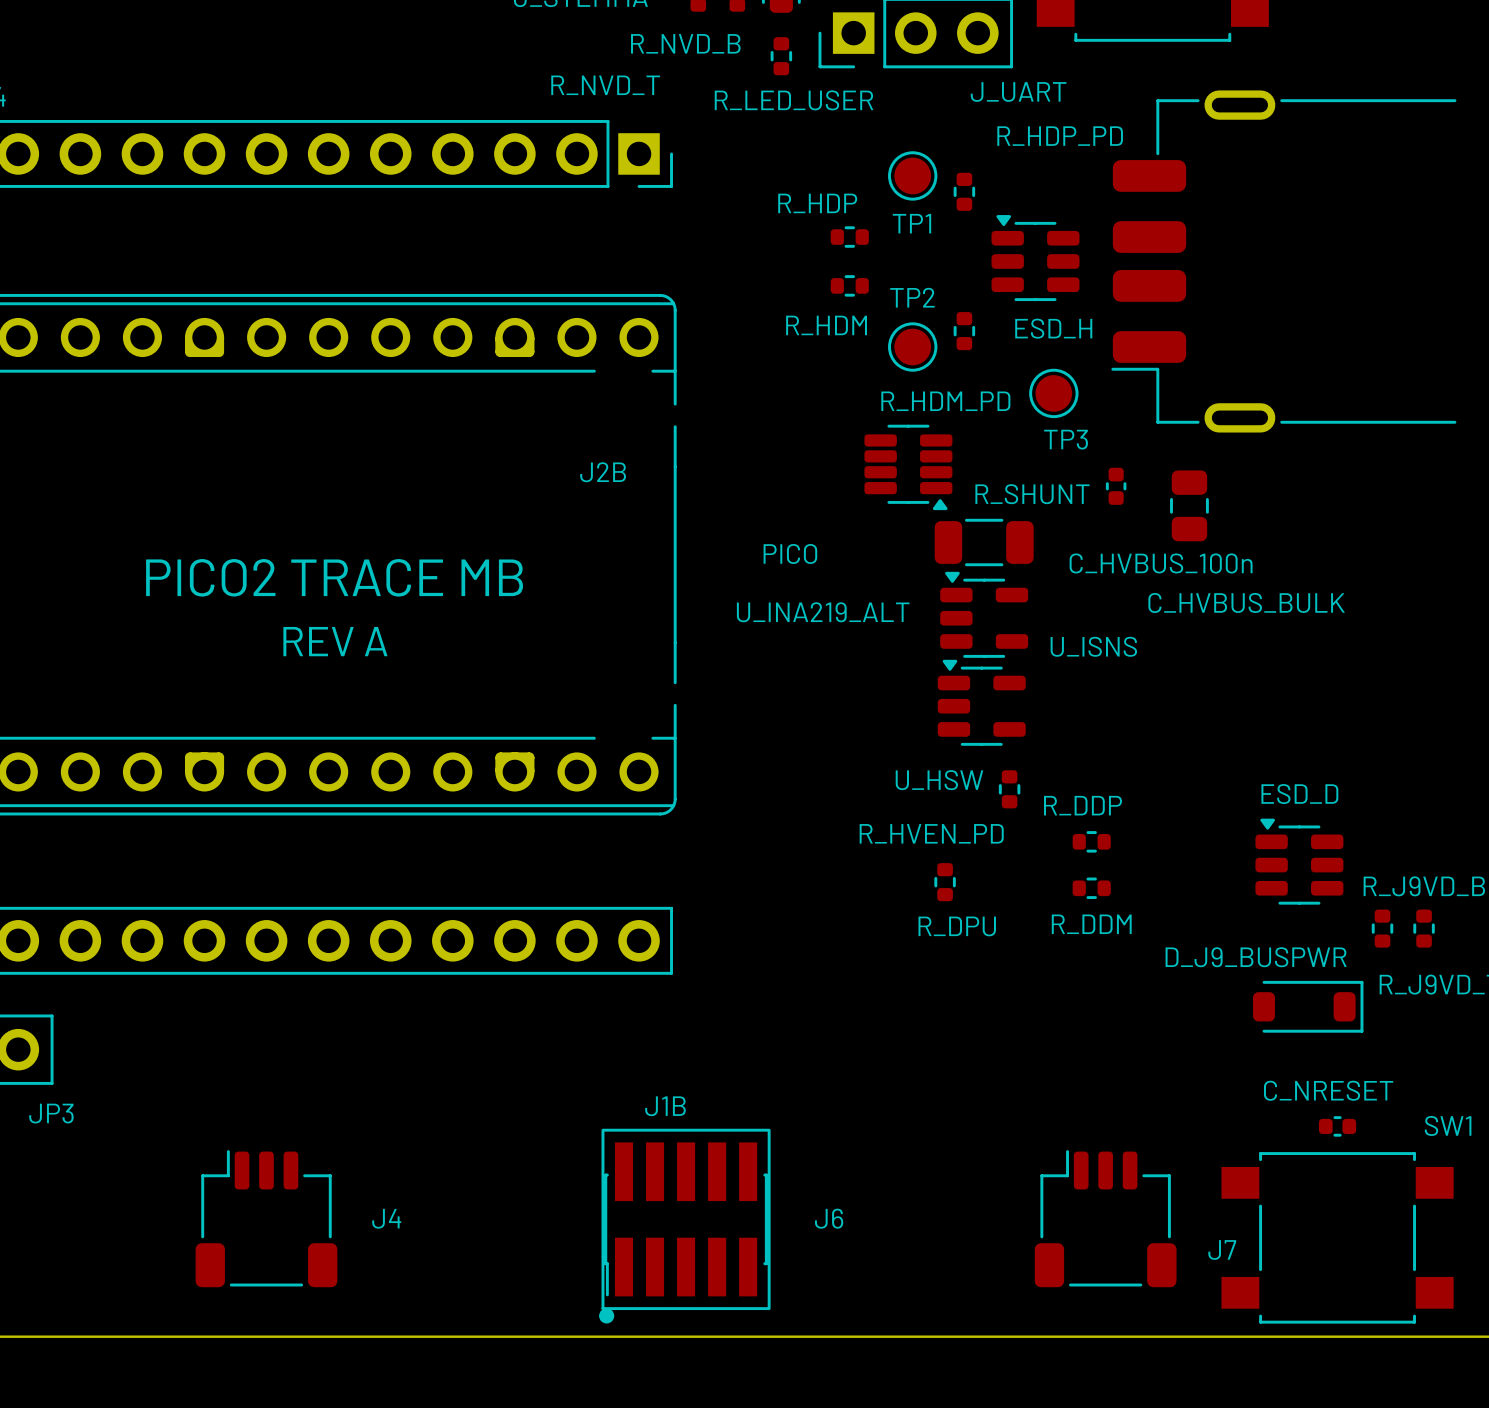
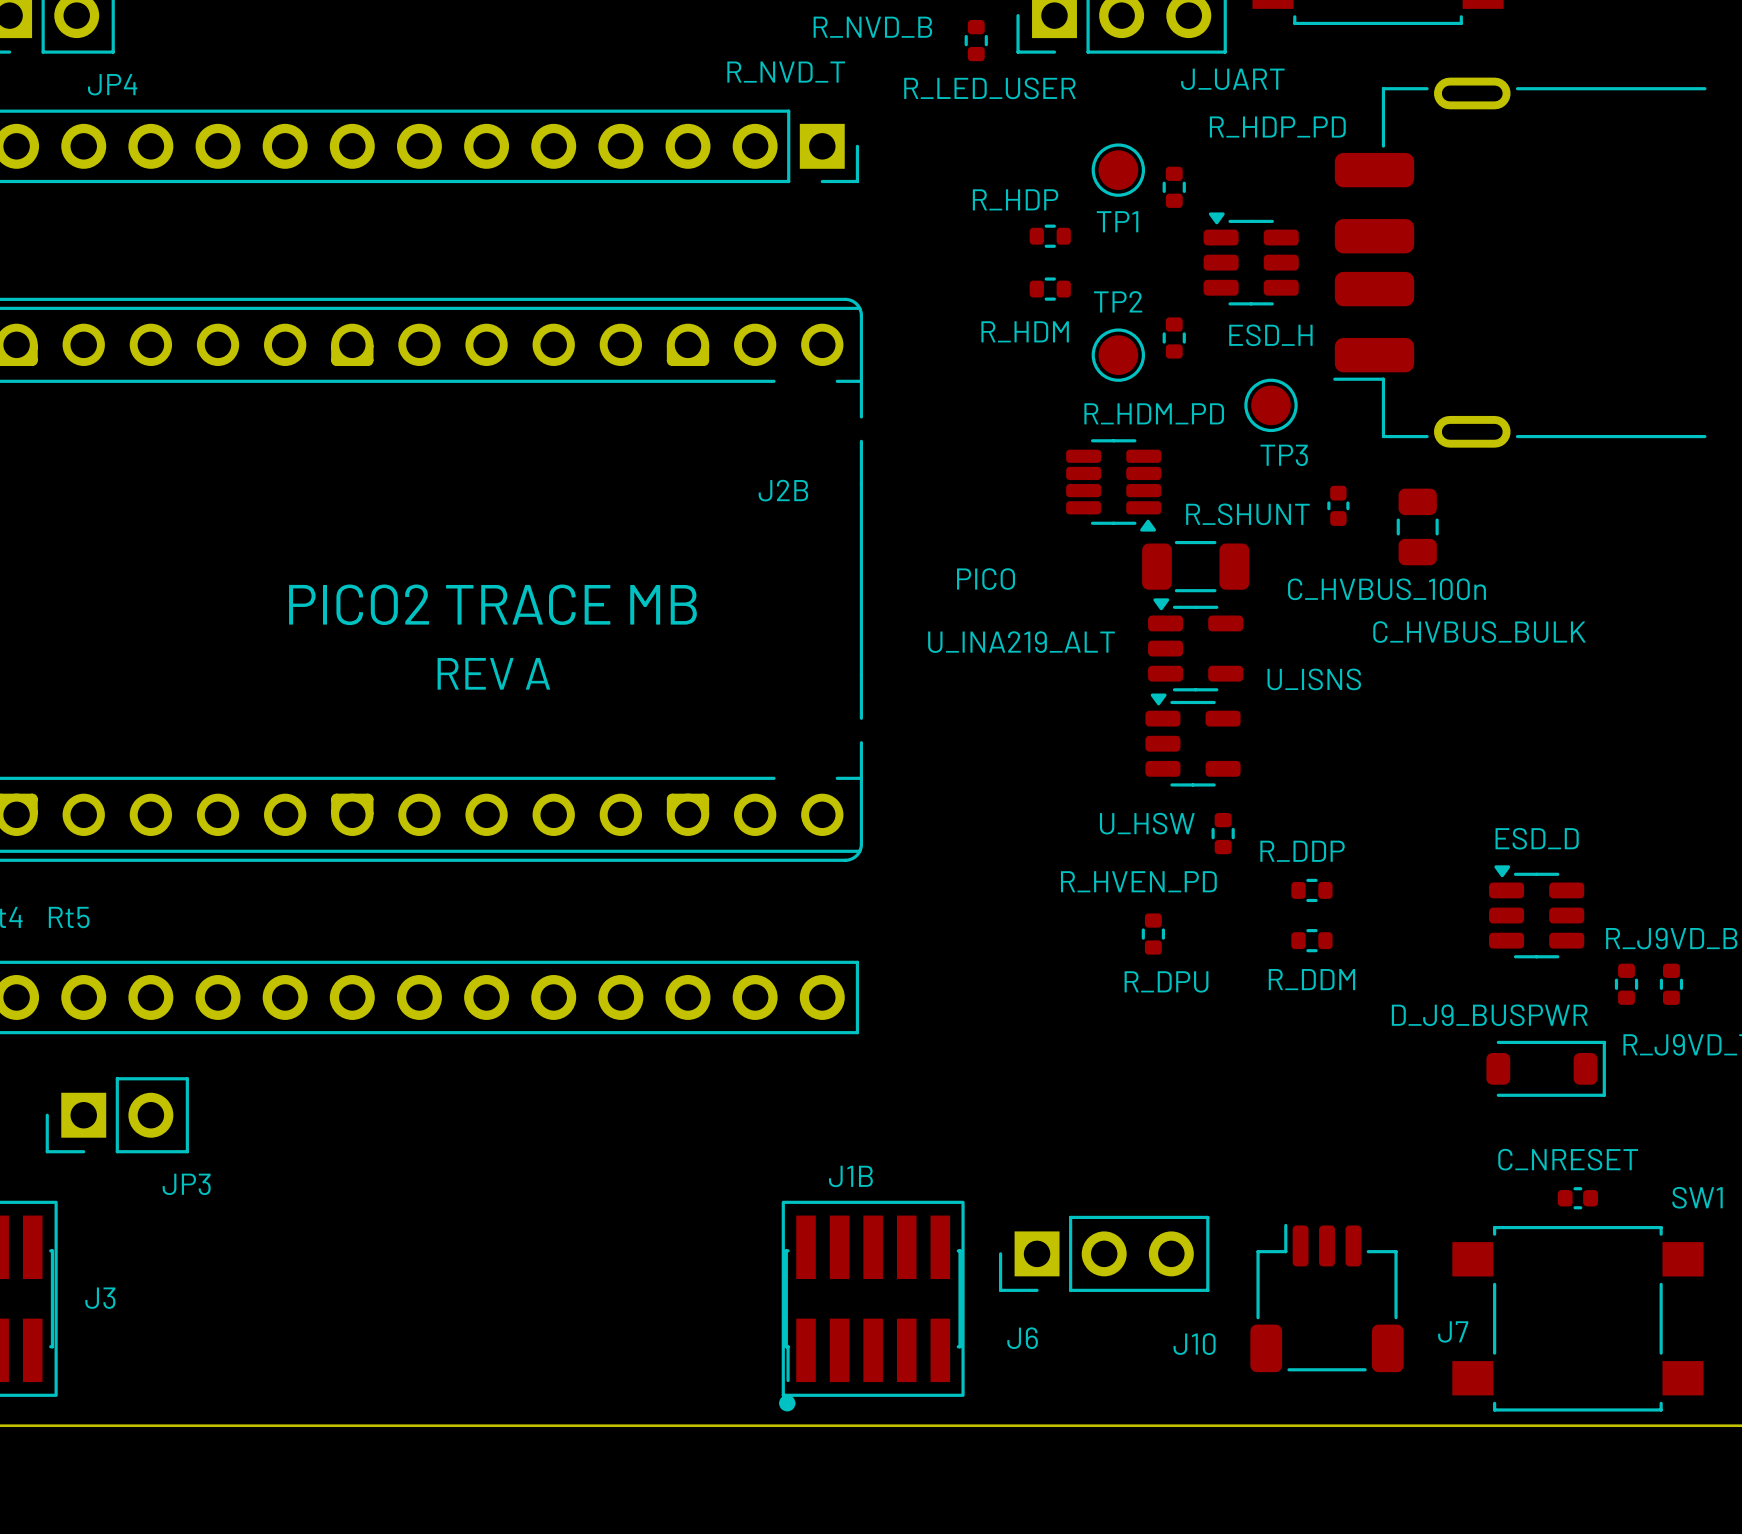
J10: none -> (1104, 1253)
J4: (266, 1218) -> none
J6 name position: J6 (829, 1218) -> J6 (1022, 1338)

